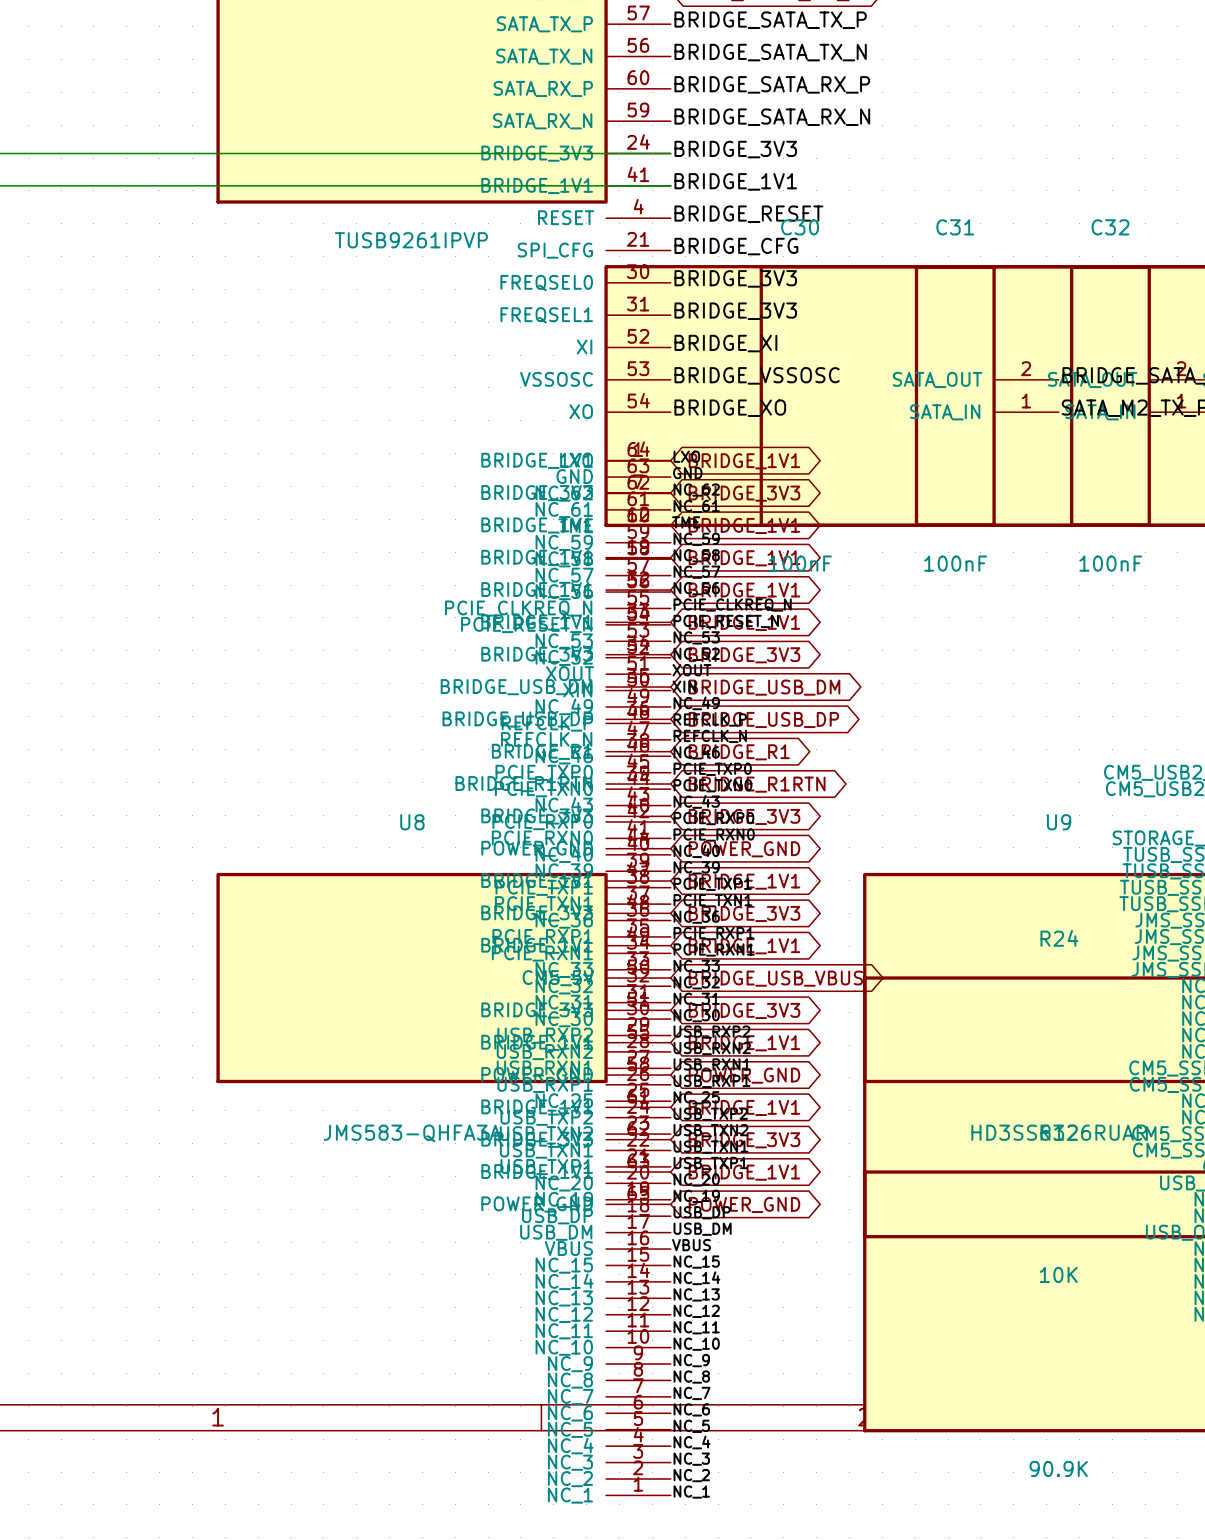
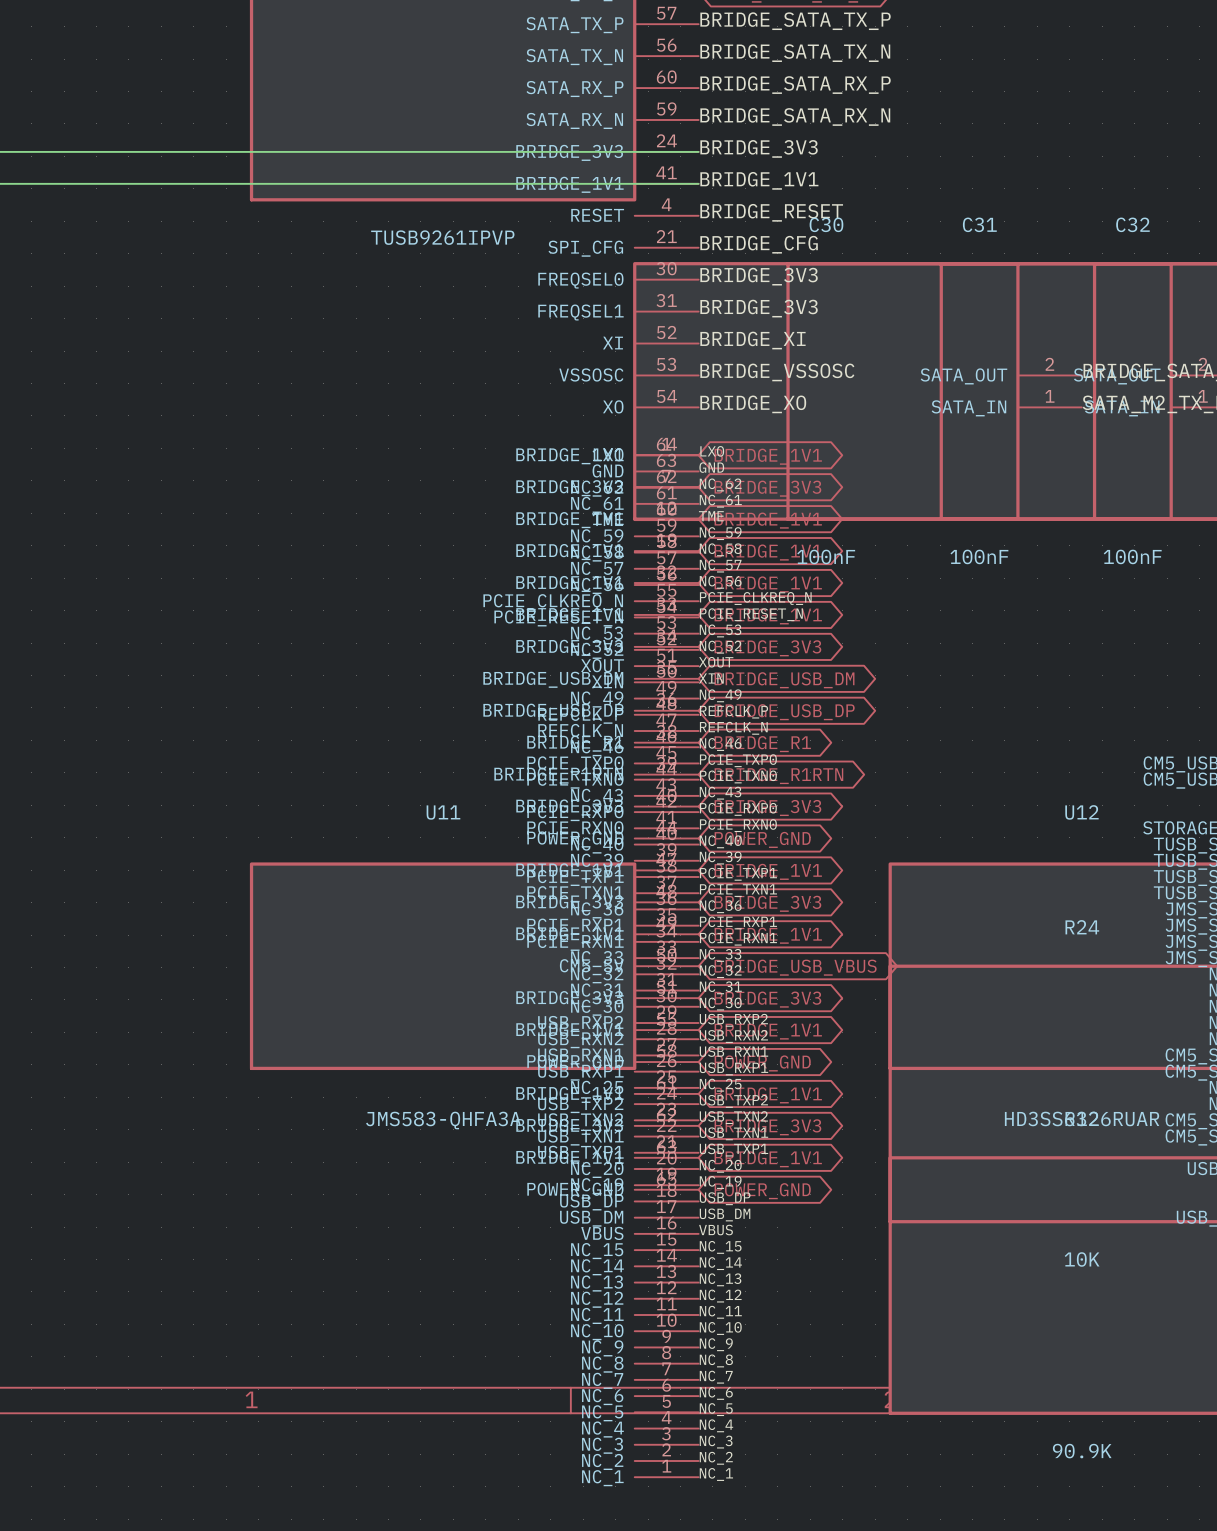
U8 name: U8 (412, 822) -> U11 (443, 812)
U9 name: U9 (1059, 822) -> U12 (1081, 812)

